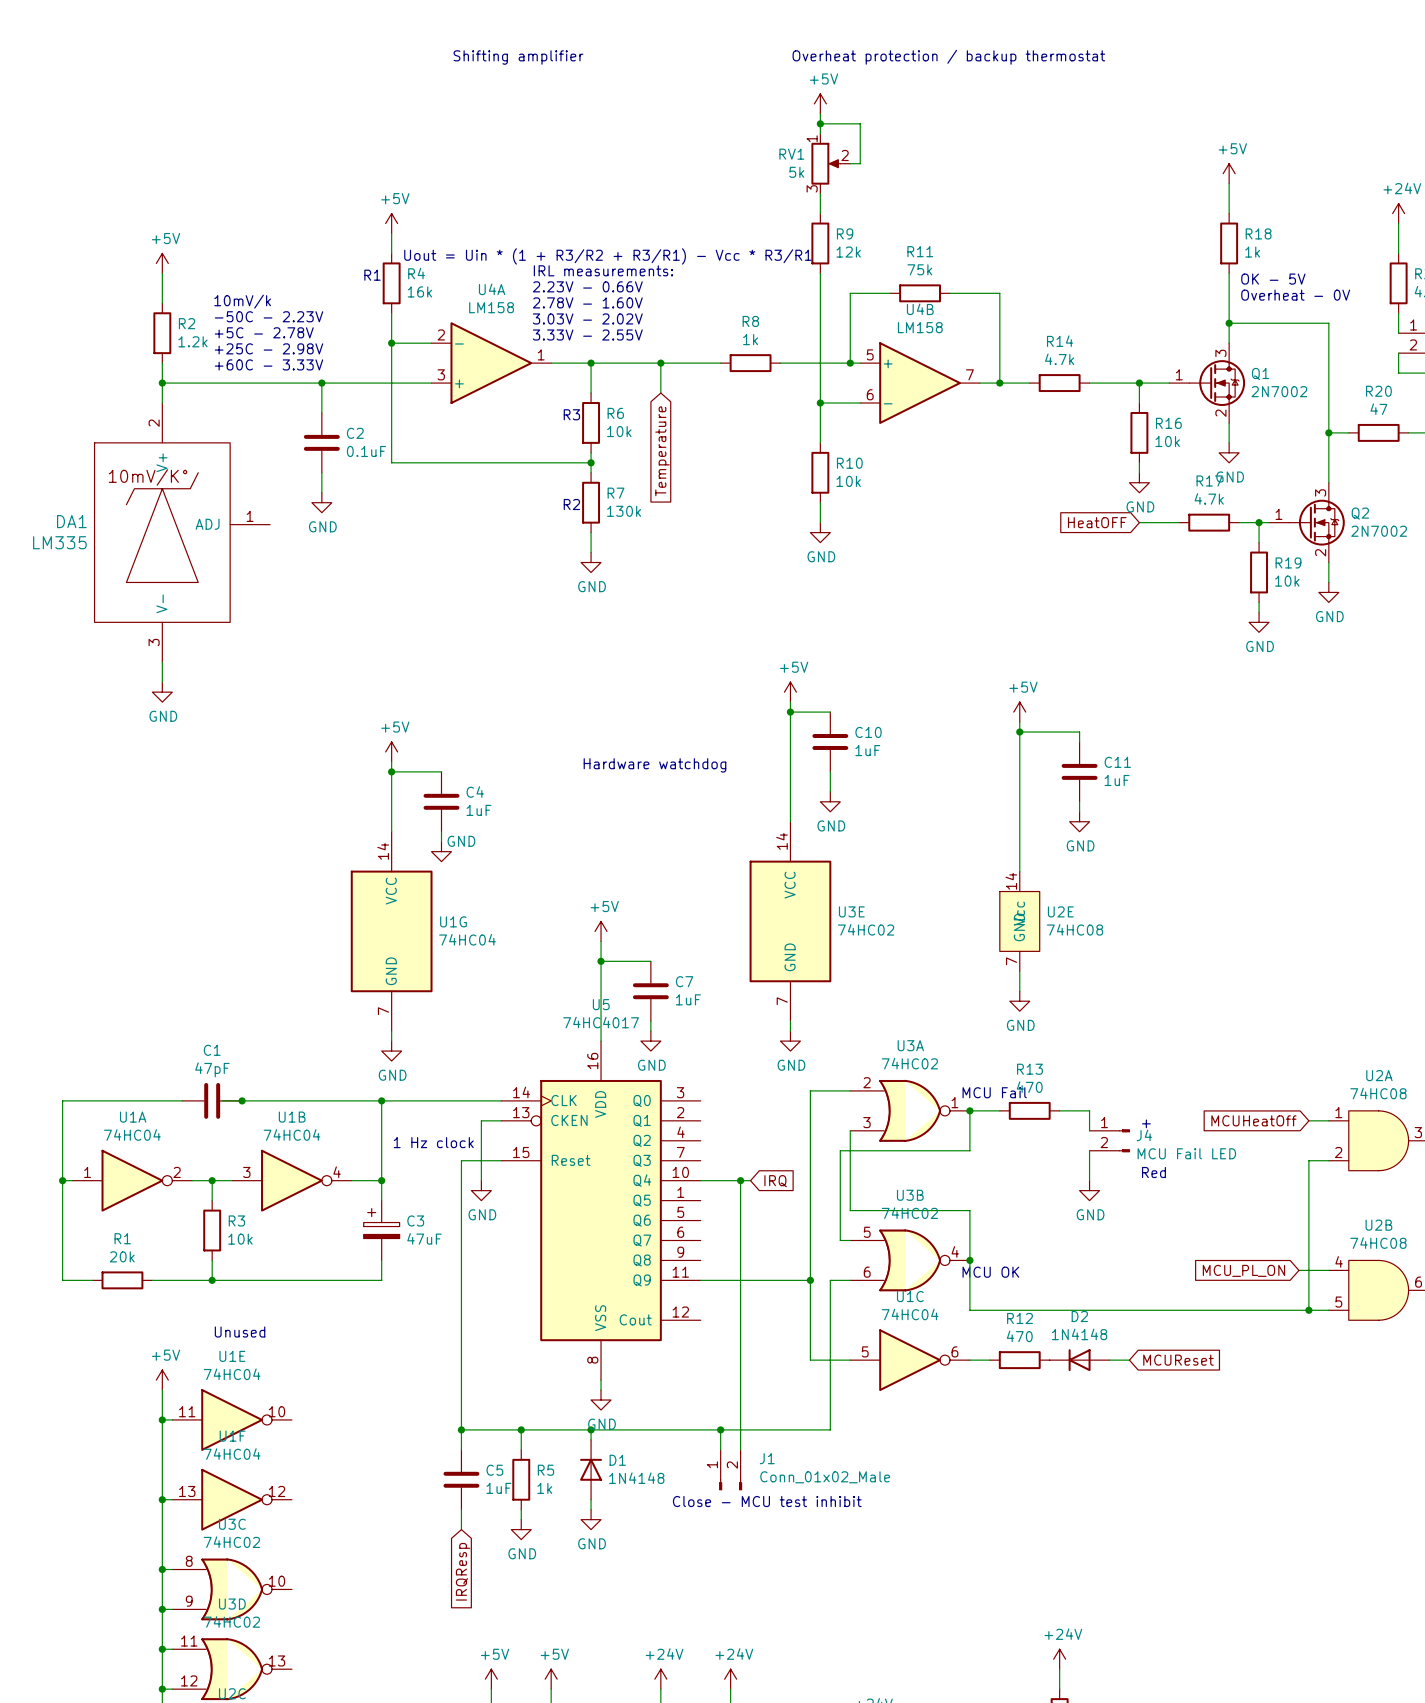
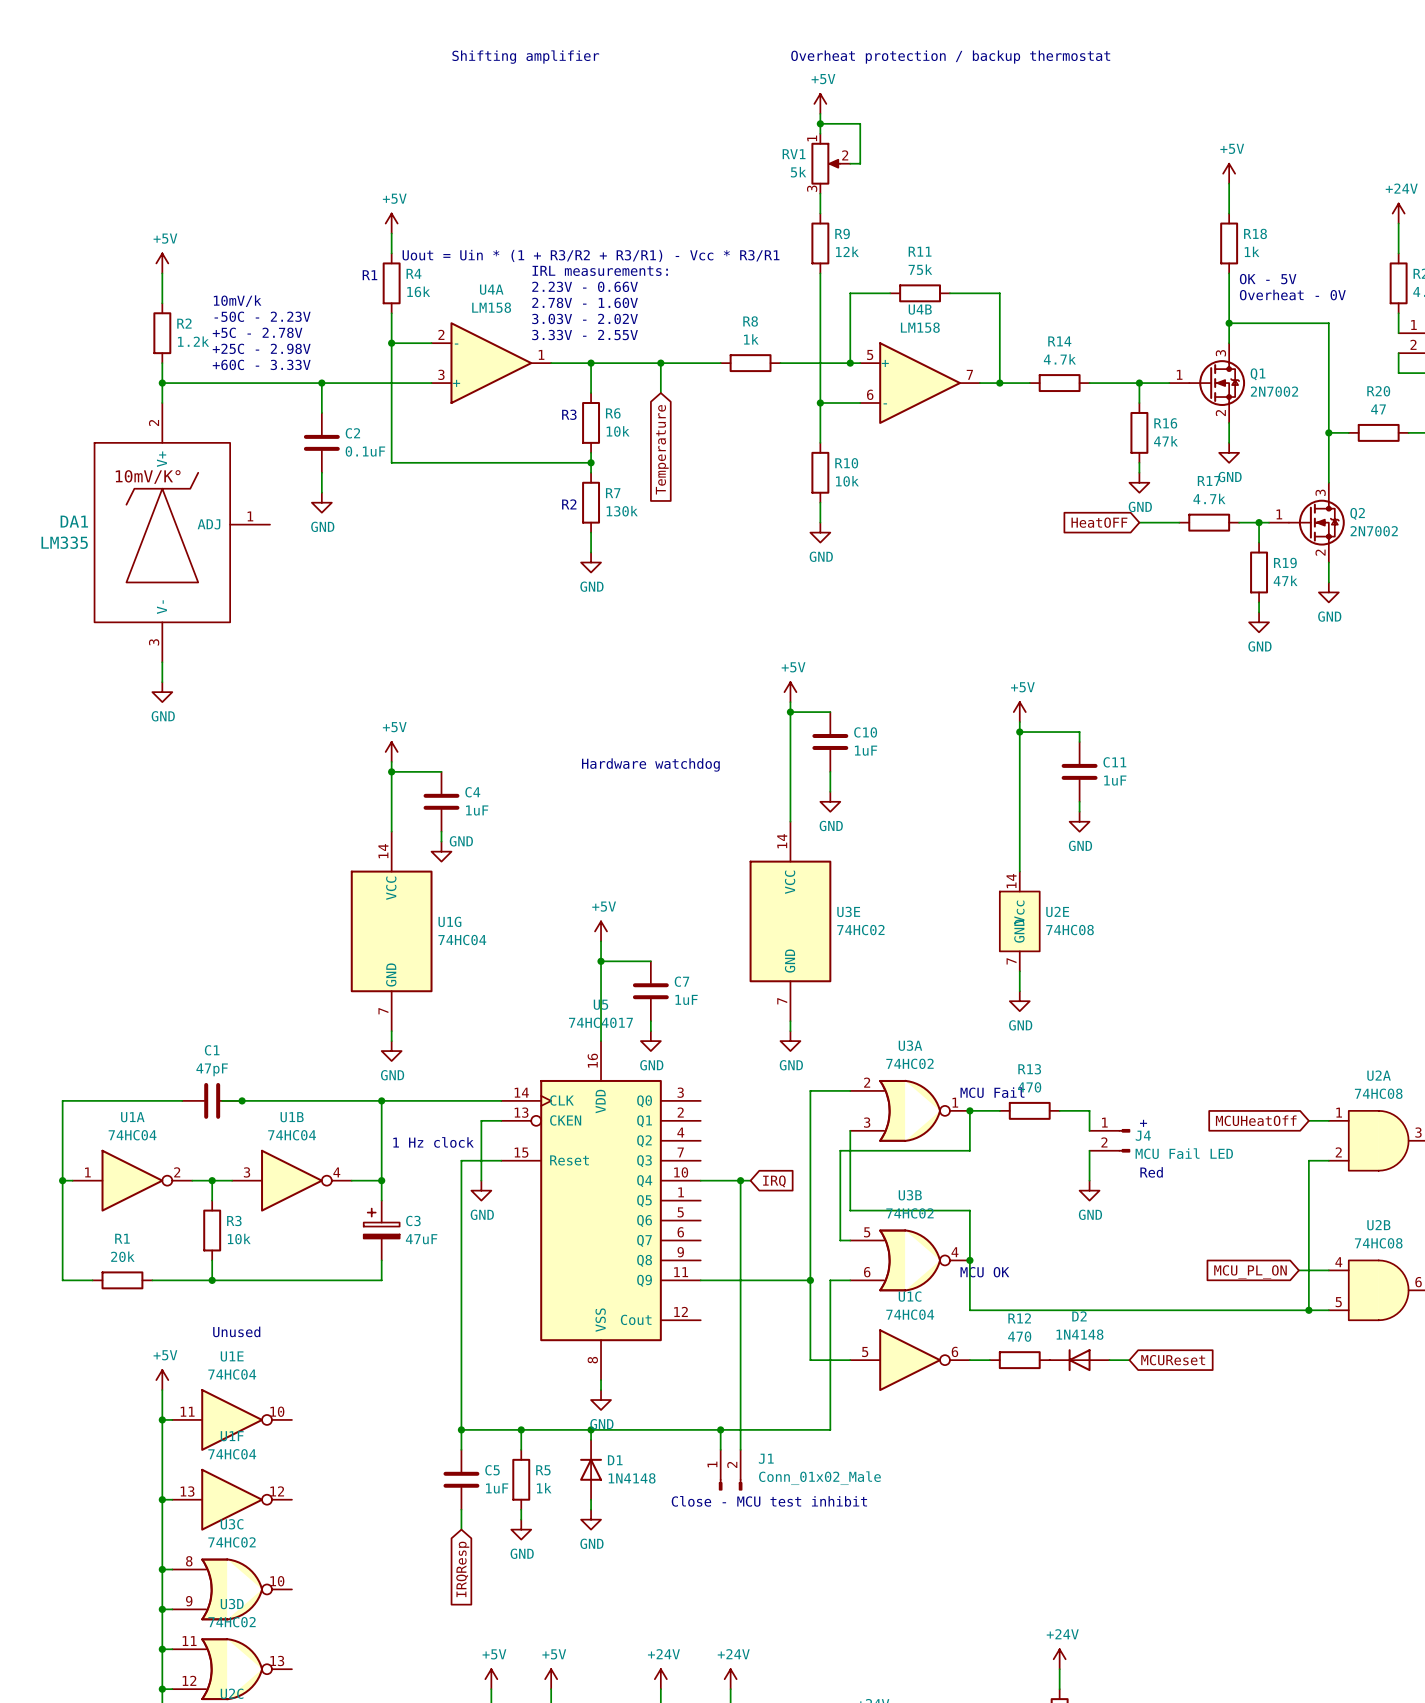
R16 value: 10k (1167, 441) -> 47k (1165, 441)
R19 value: 10k (1287, 581) -> 47k (1285, 580)

